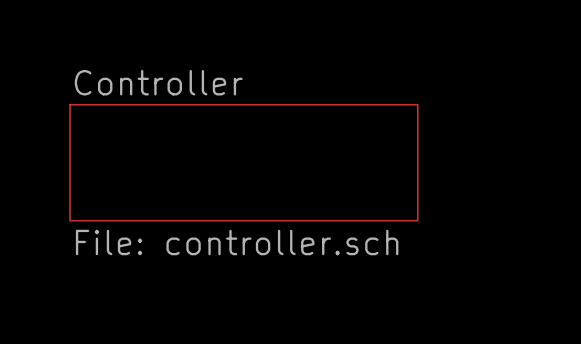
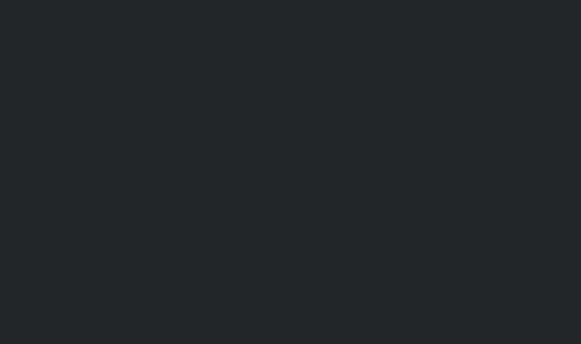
sheet Controller: File: controller.sch (243, 162) -> none

